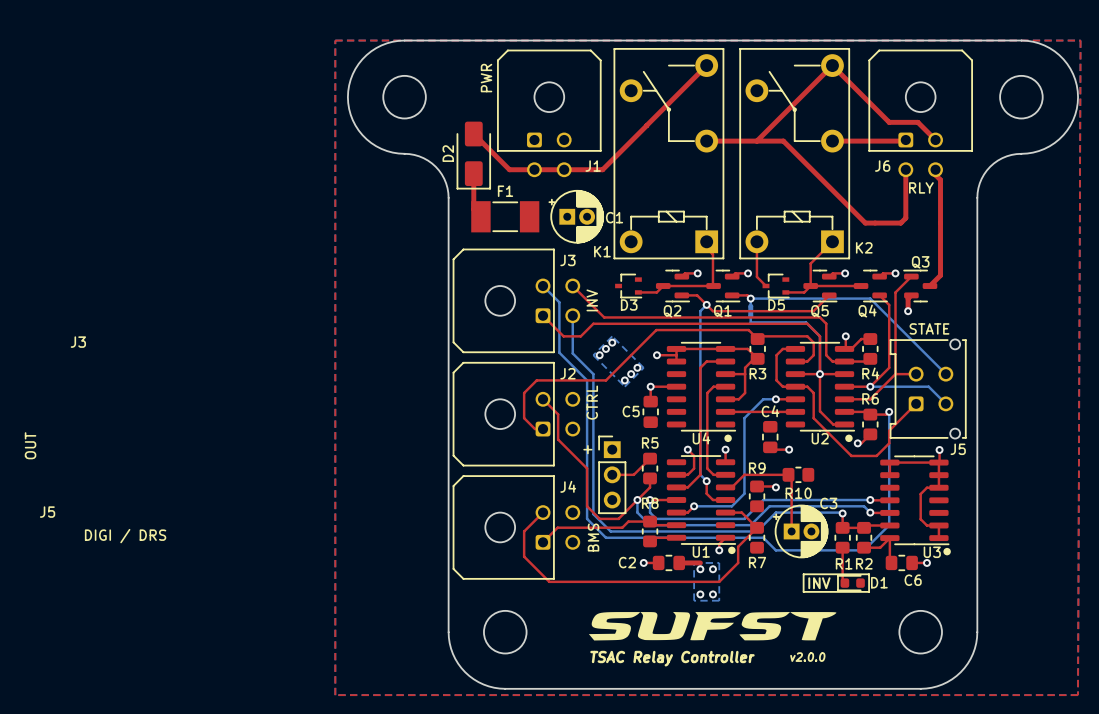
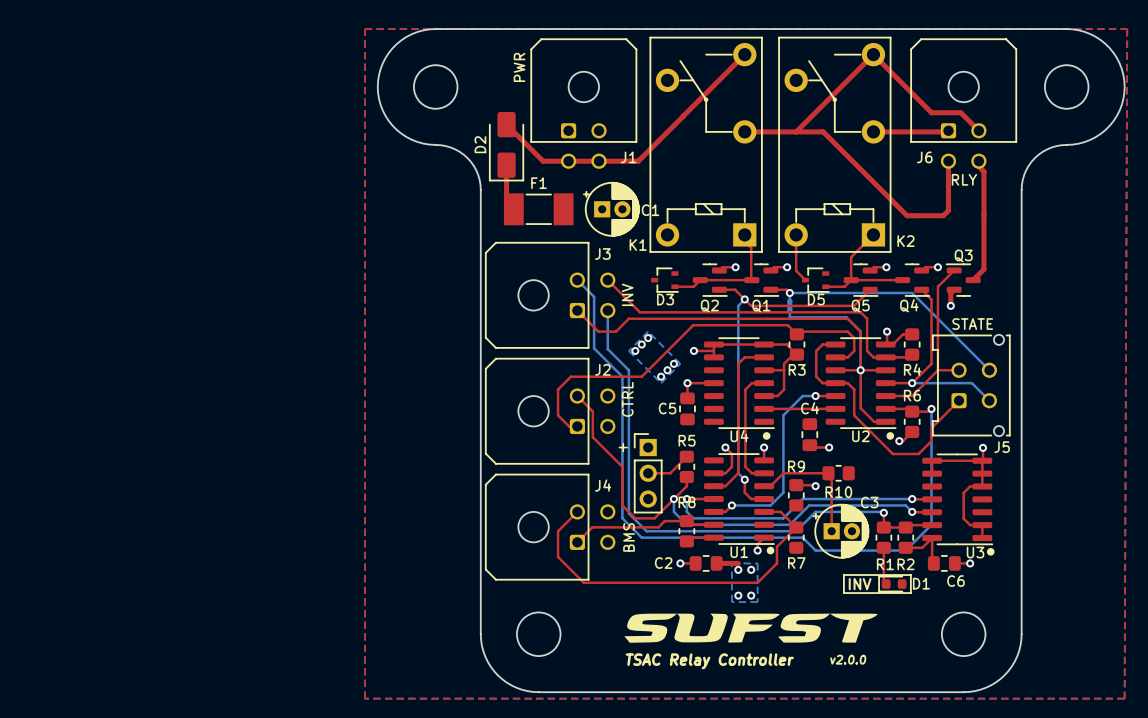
text: J3 (78, 342) -> none
text: OUT (30, 445) -> none
text: J5 (47, 512) -> none
text: DIGI / DRS (125, 536) -> none

